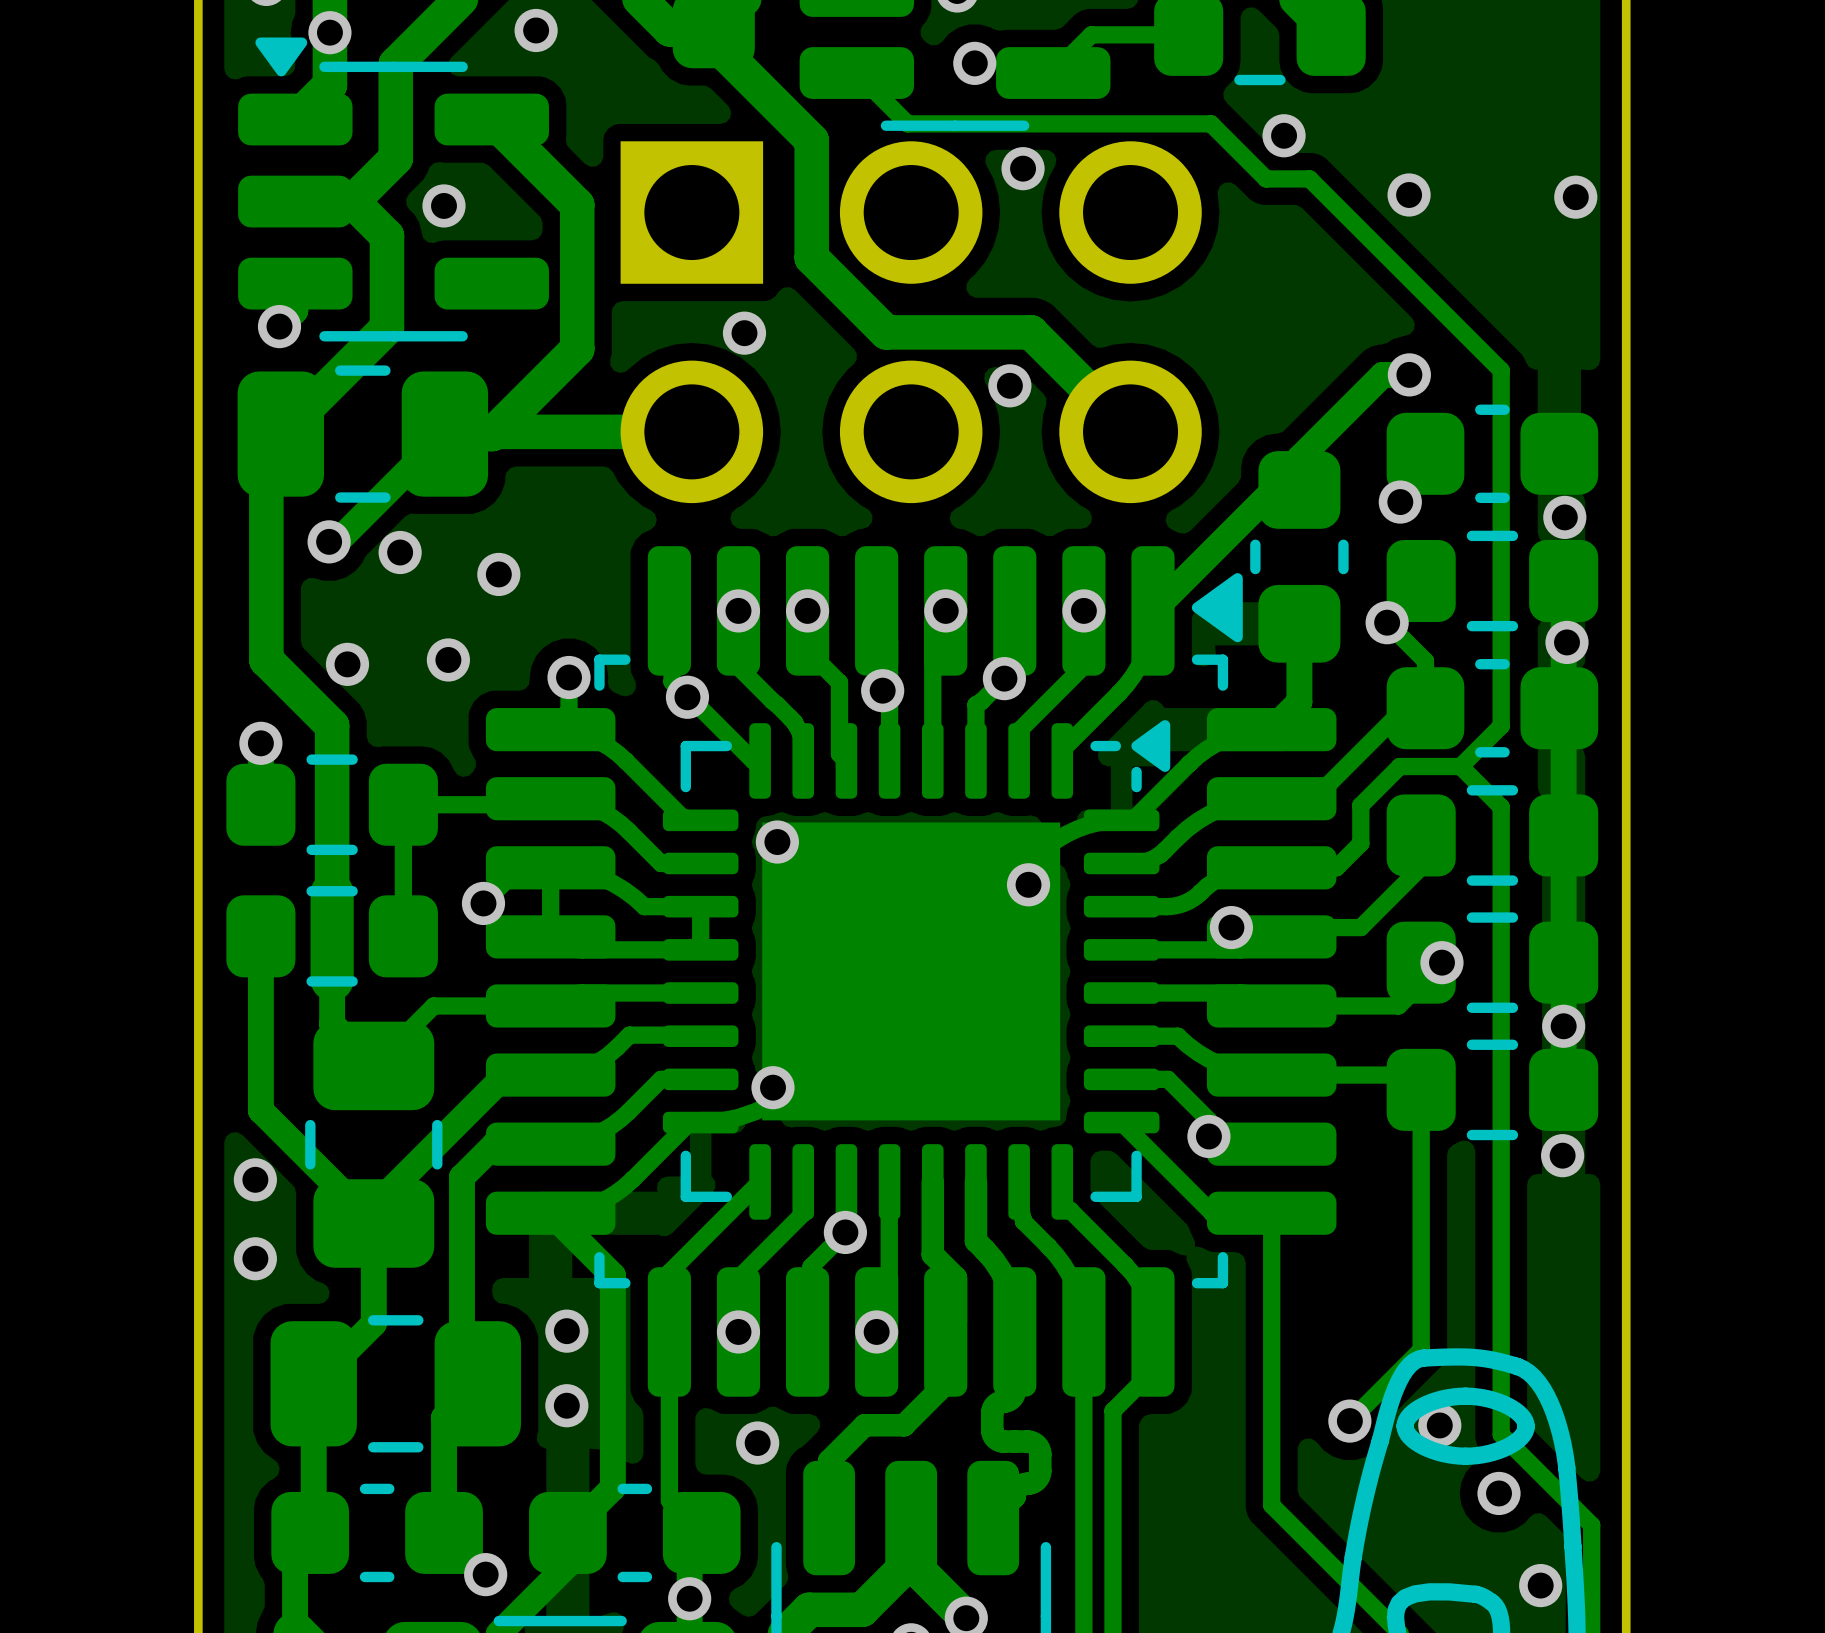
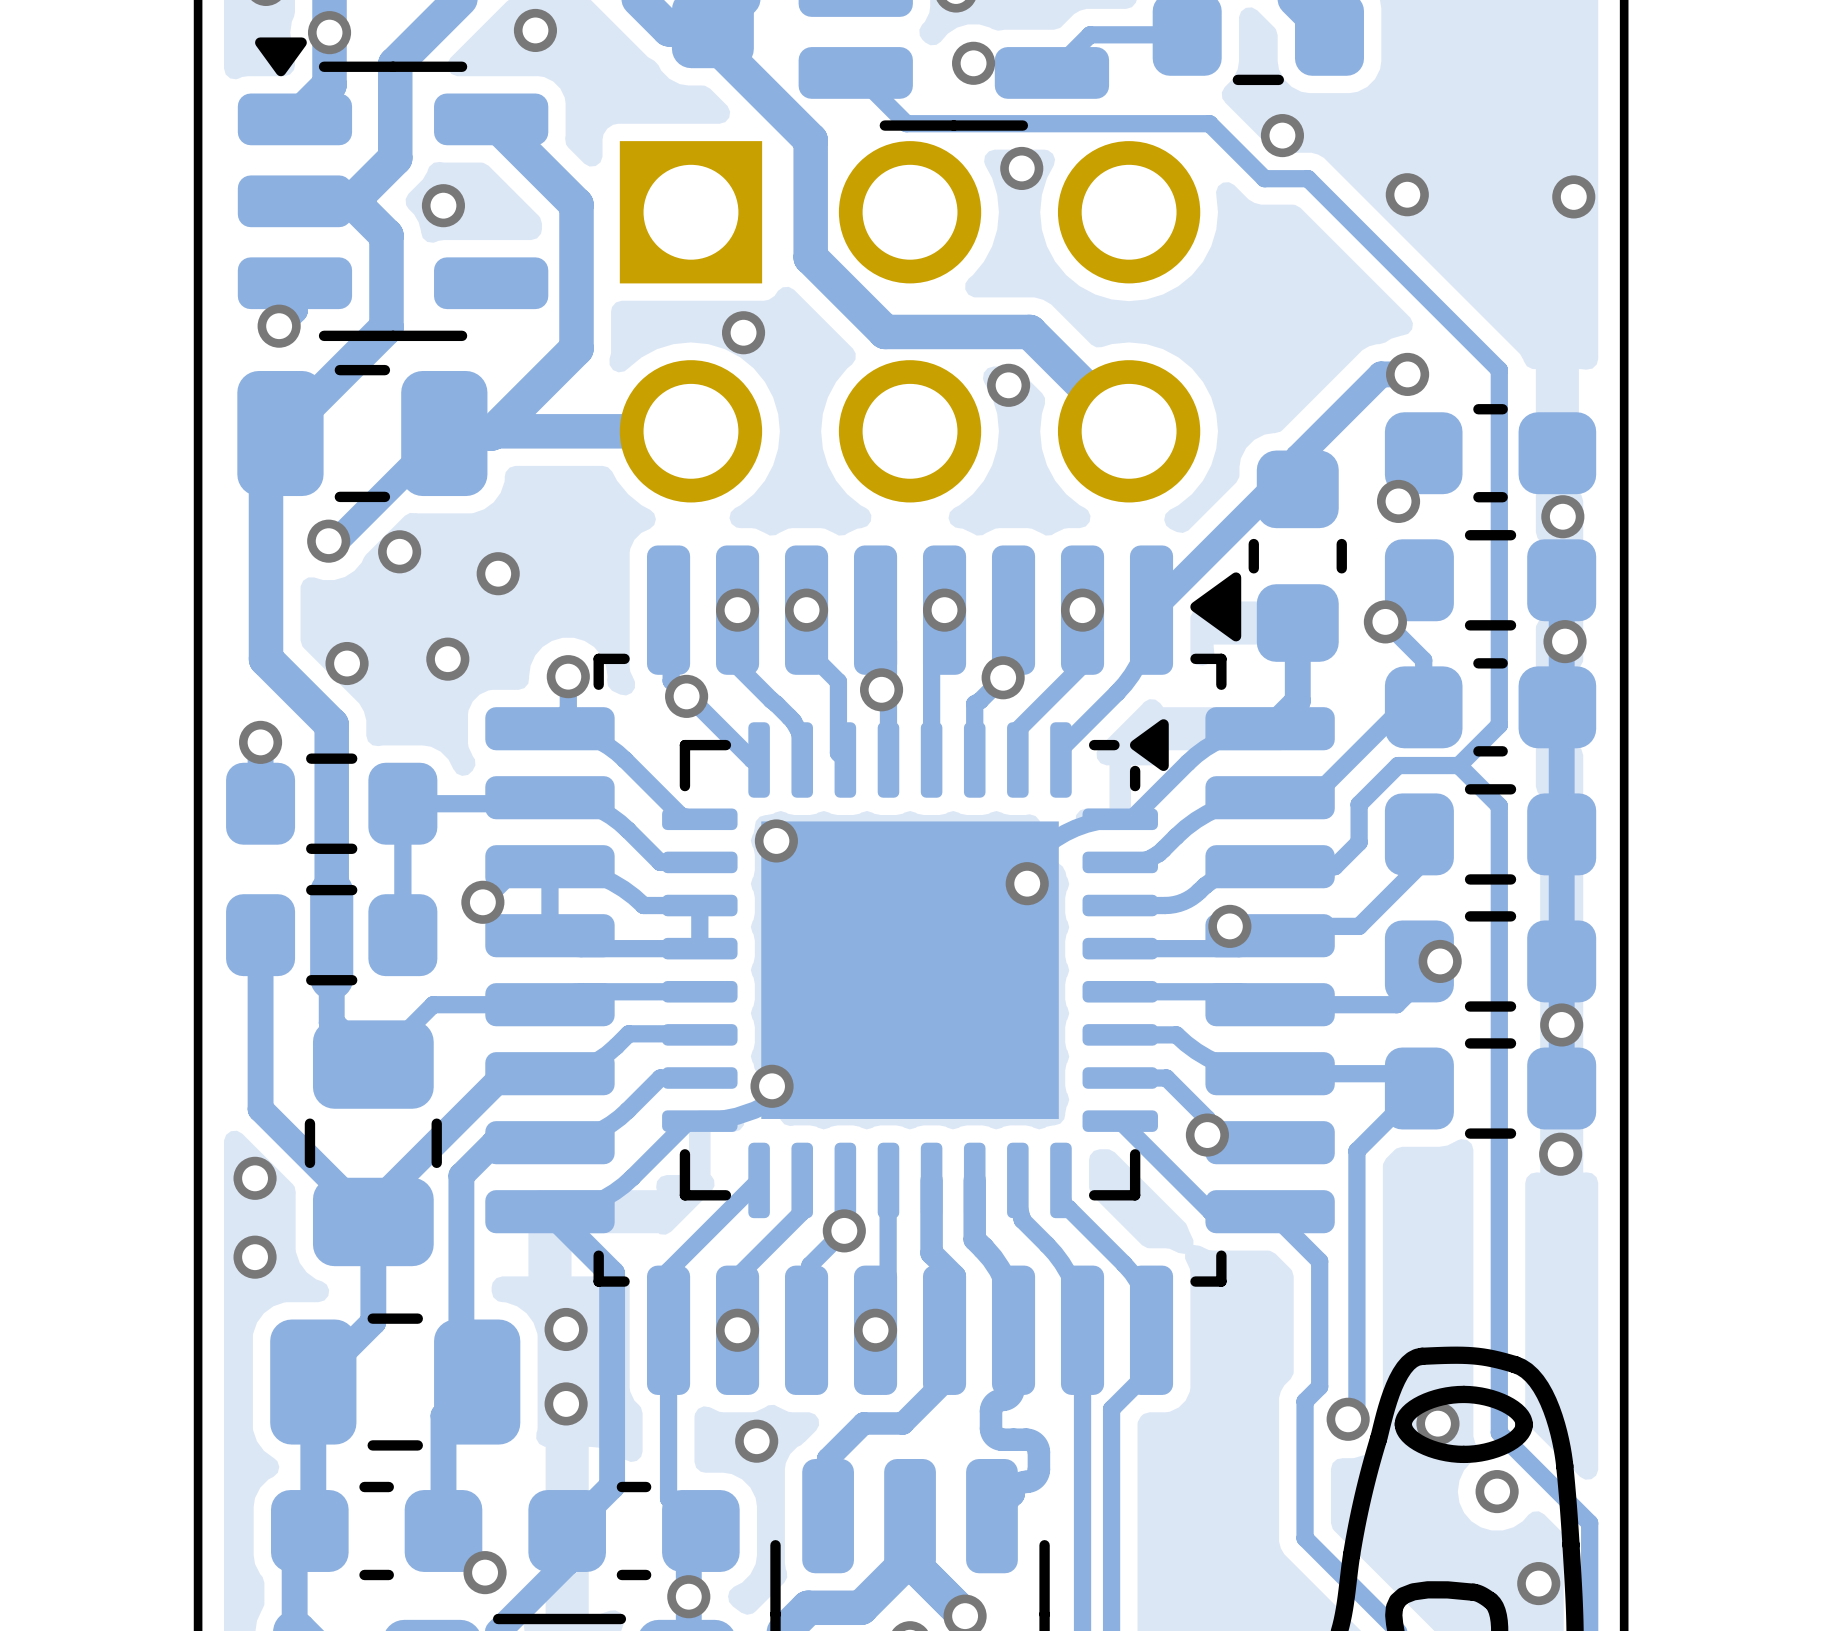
track: (1421, 1089) (1421, 1349) (1358, 1412) -> (1419, 1088) (1356, 1150) (1356, 1410)
track: (1271, 1213) (1271, 1505) (1306, 1540) -> (1270, 1211) (1319, 1261) (1319, 1386) (1305, 1401) (1305, 1538)

